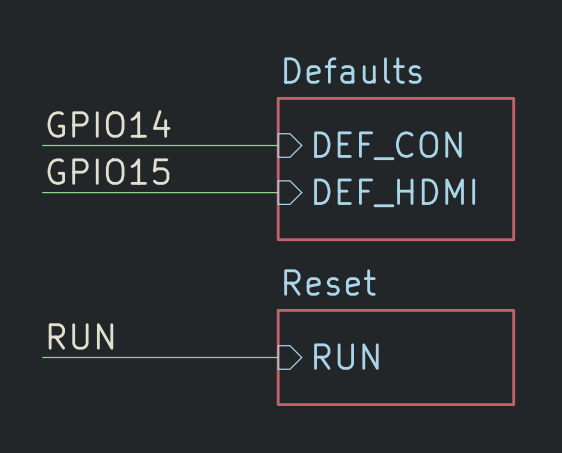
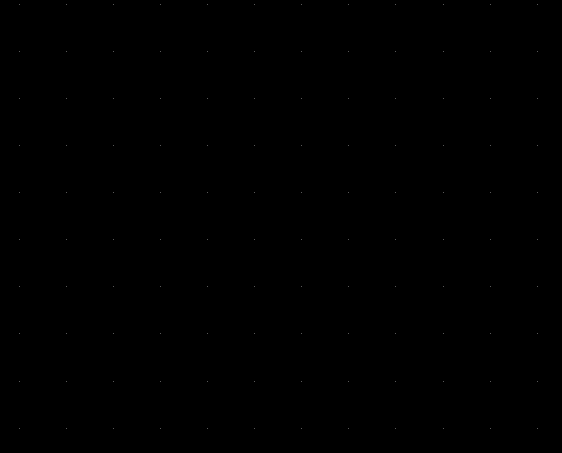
label: GPIO14 (109, 123) -> none
wire: (42, 145) (278, 145) -> none
sheet pin: DEF_CON (387, 145) -> none
sheet Defaults: (395, 169) -> none
label: GPIO15 (108, 171) -> none
wire: (42, 192) (278, 192) -> none
sheet pin: DEF_HDMI (394, 192) -> none
label: RUN (80, 336) -> none
sheet pin: RUN (346, 356) -> none
wire: (42, 357) (278, 357) -> none
sheet Reset: (395, 357) -> none

